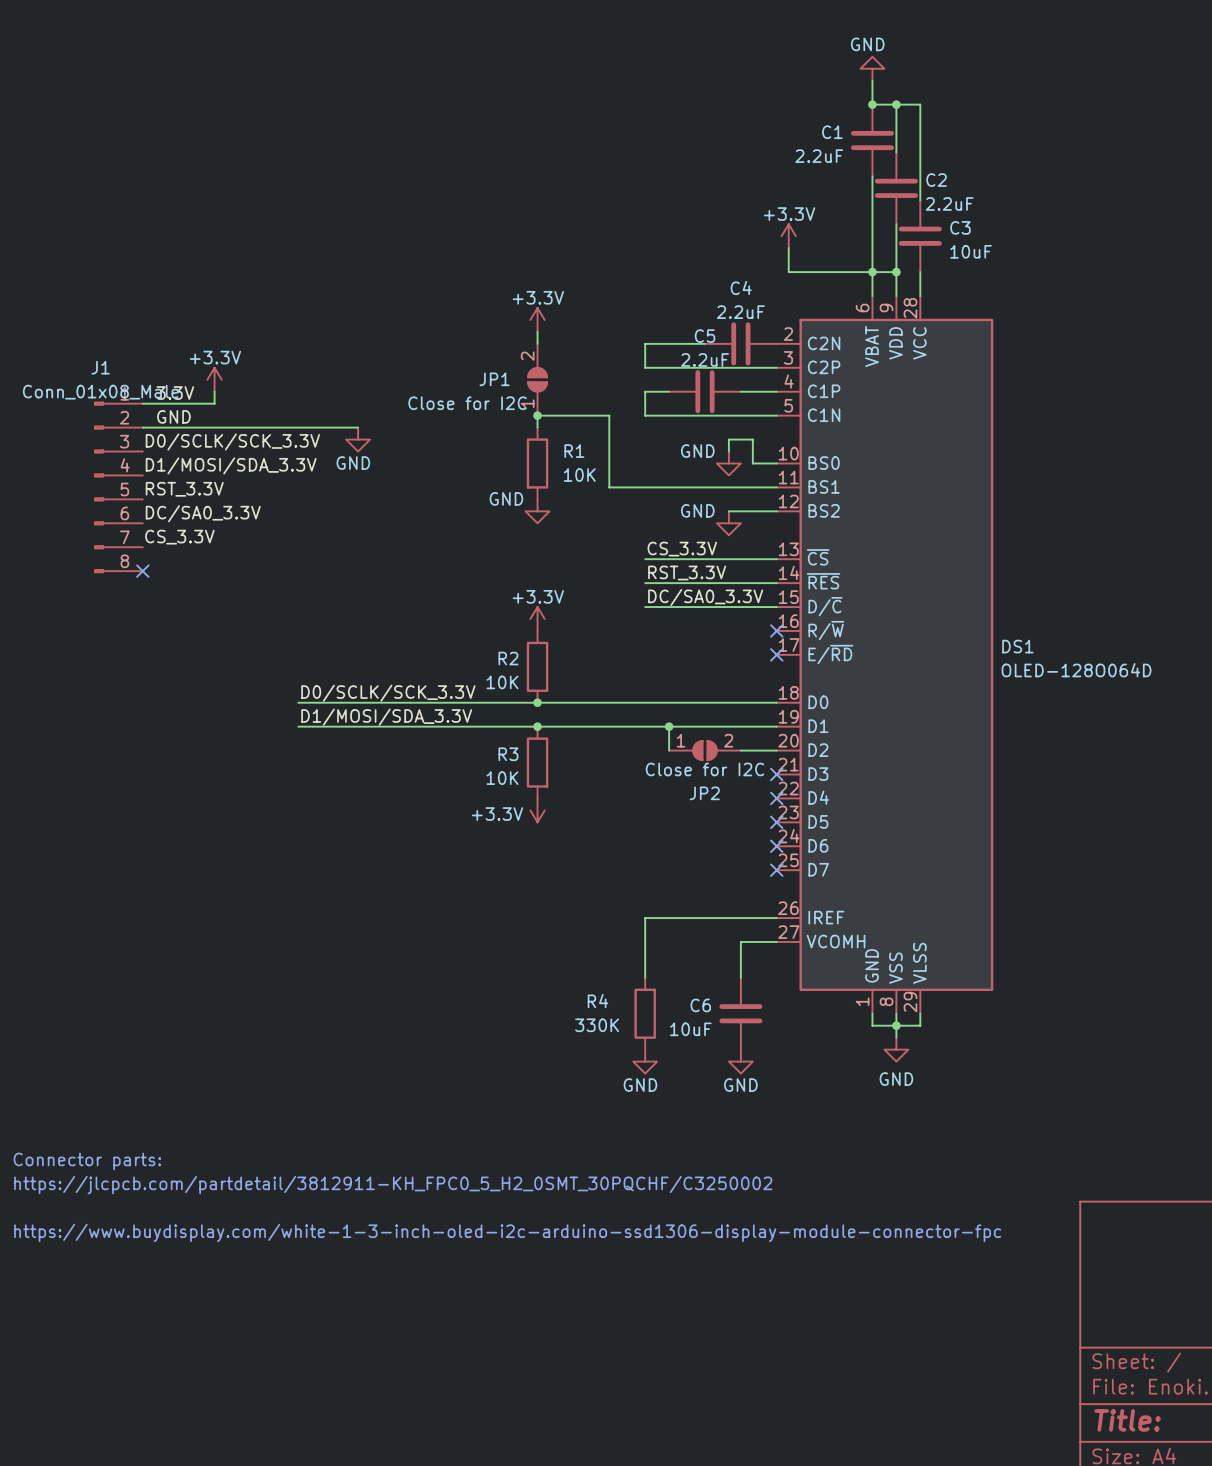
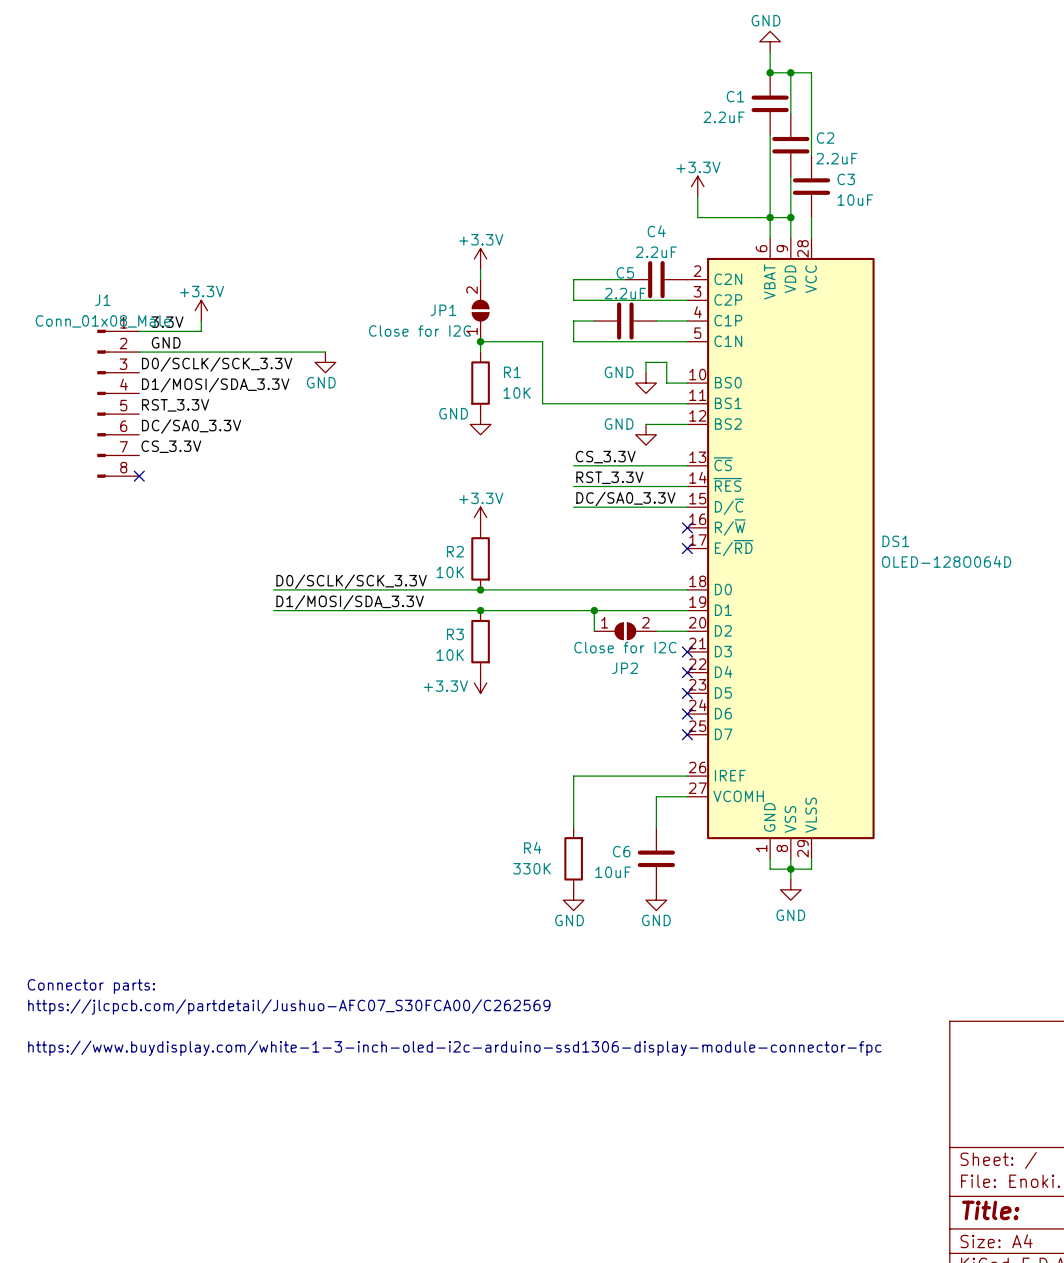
text: https://jlcpcb.com/partdetail/3812911-KH_FPC0_5_H2_0SMT_30PQCHF/C3250002 (393, 1185) -> https://jlcpcb.com/partdetail/Jushuo-AFC07_S30FCA00/C262569 (289, 1006)

